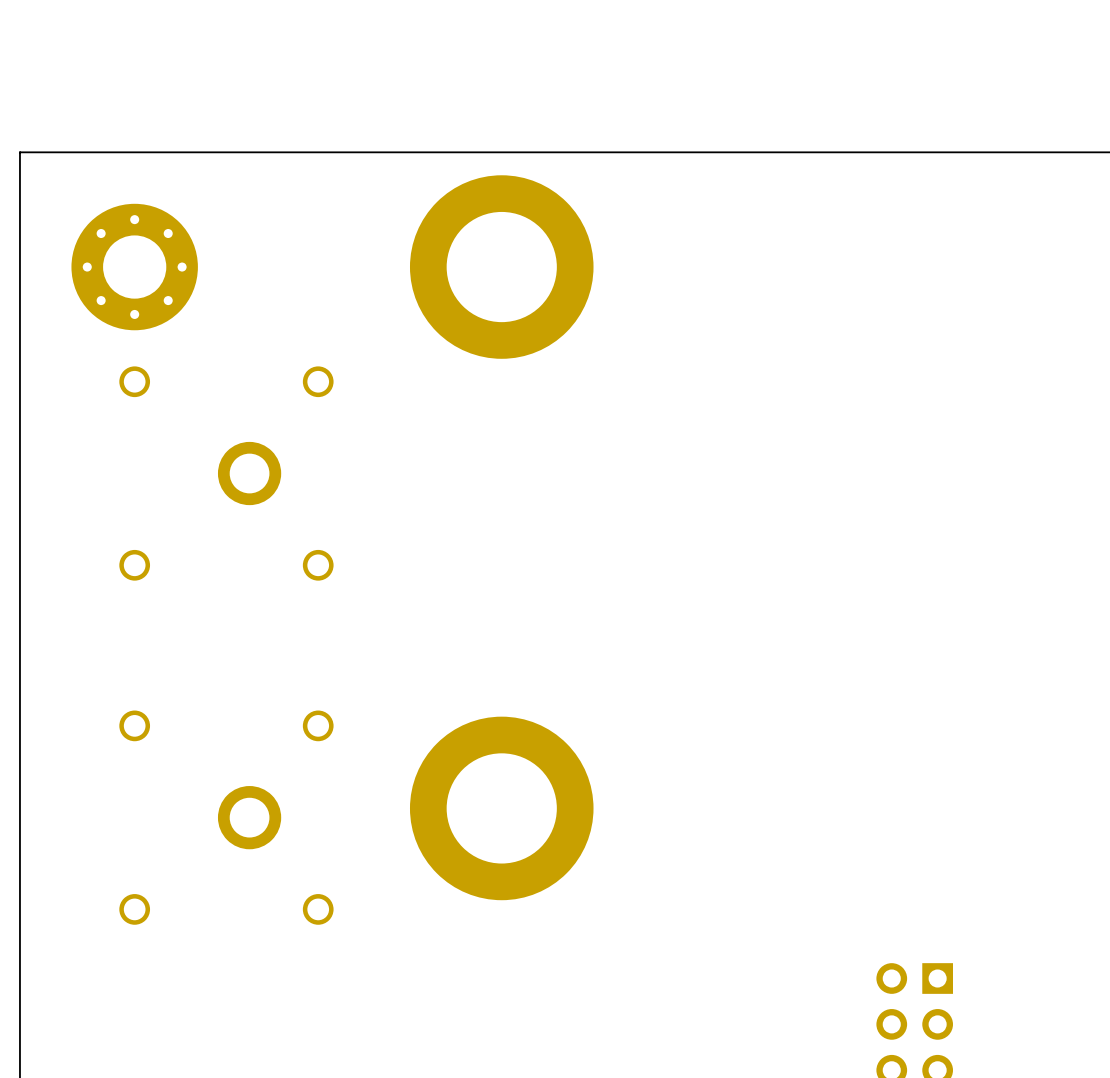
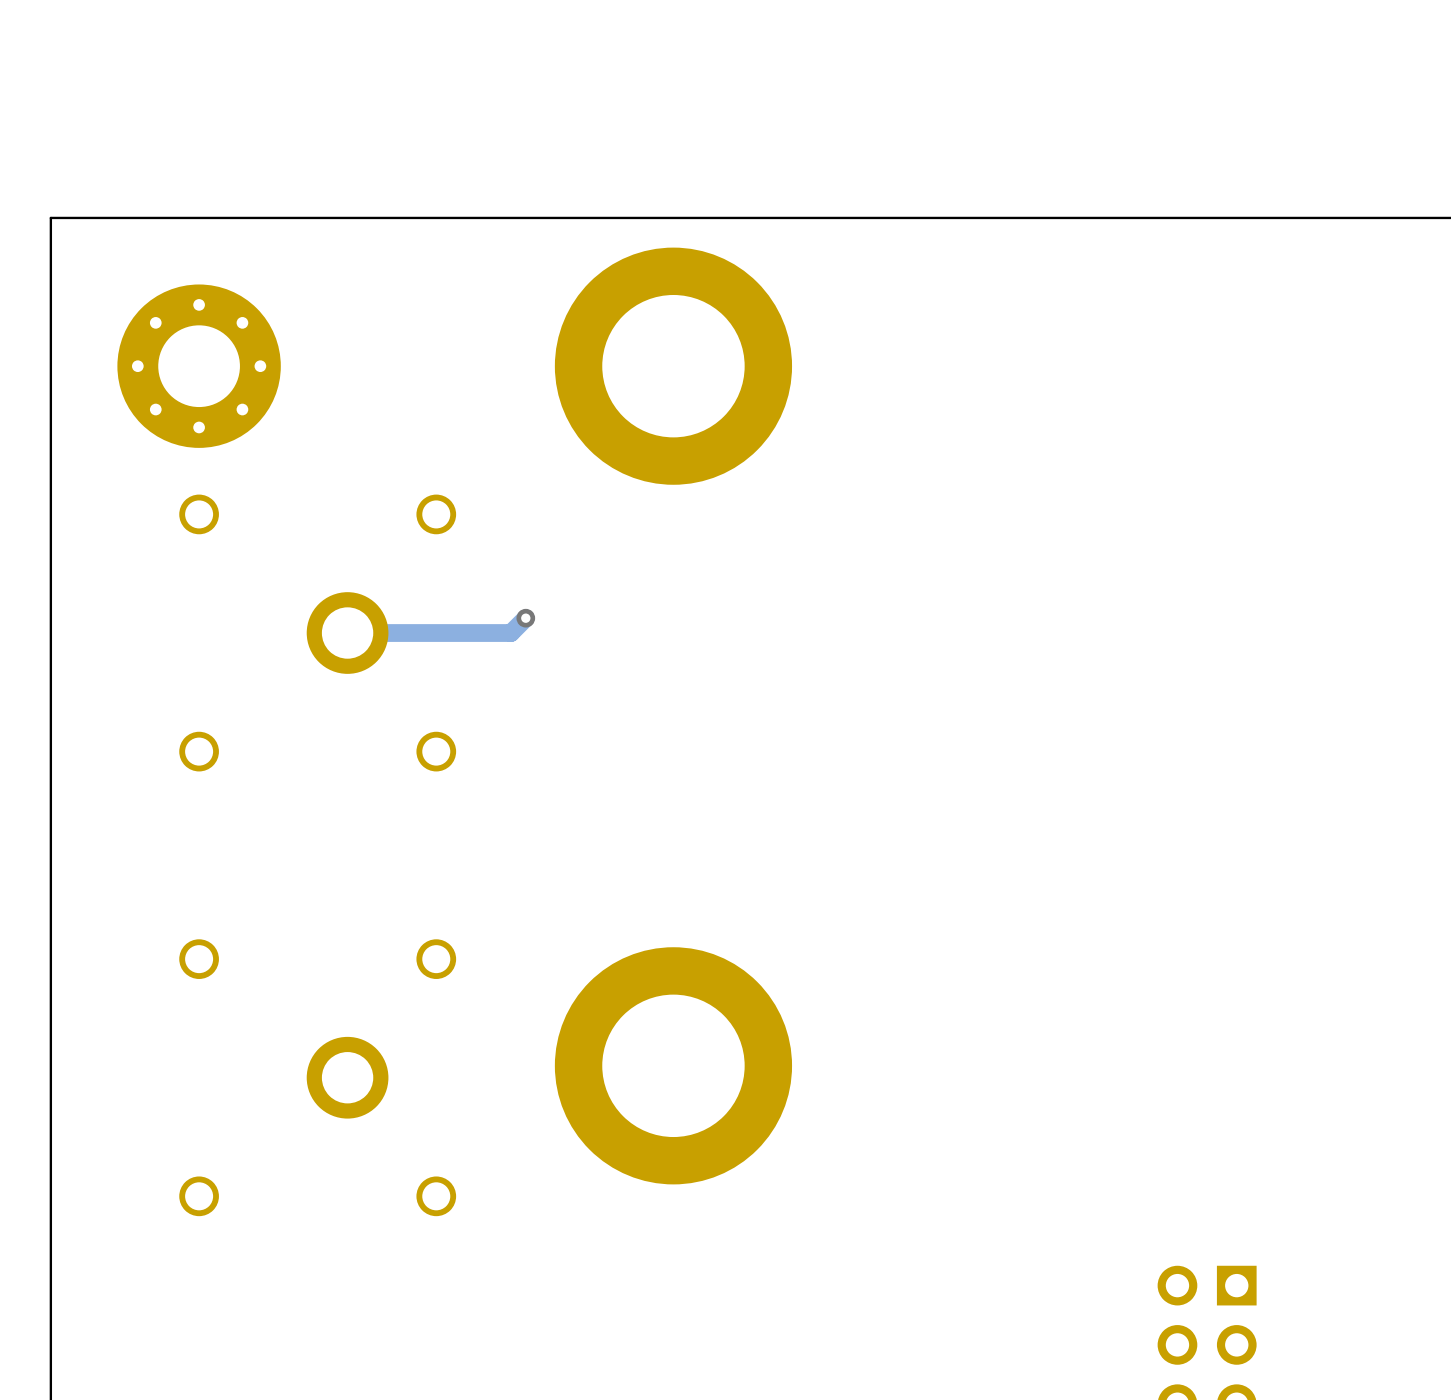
track: none -> (525, 618) (510, 633) (347, 633)
via: none -> (525, 618)

